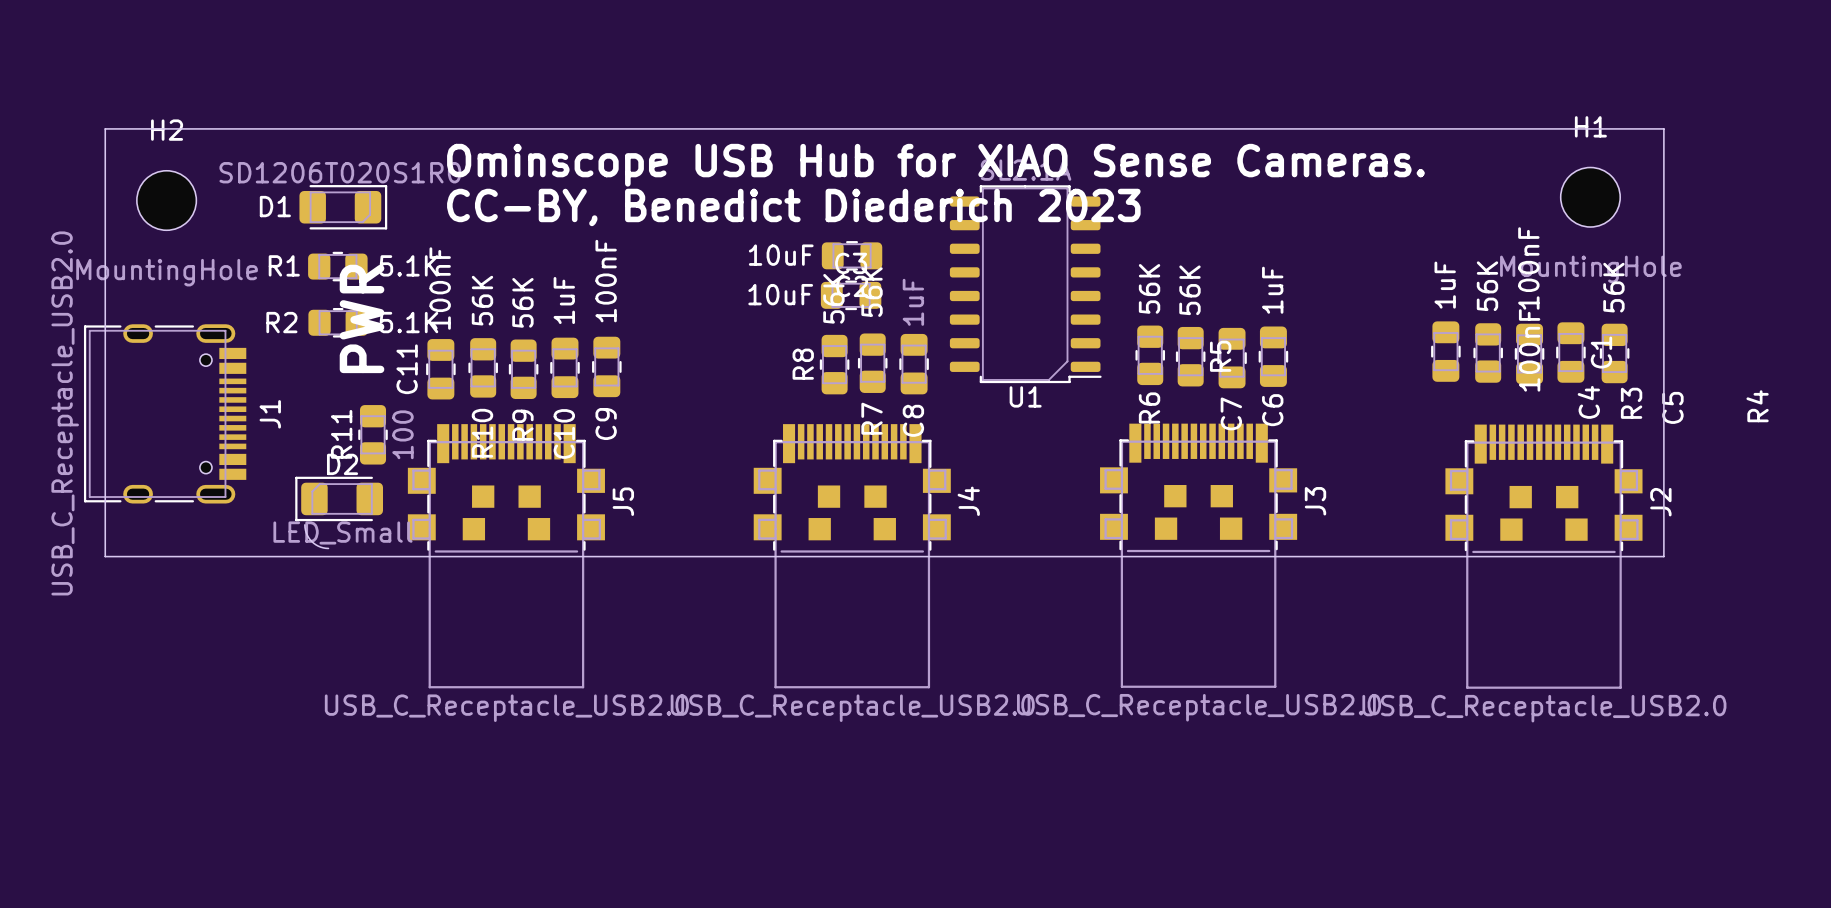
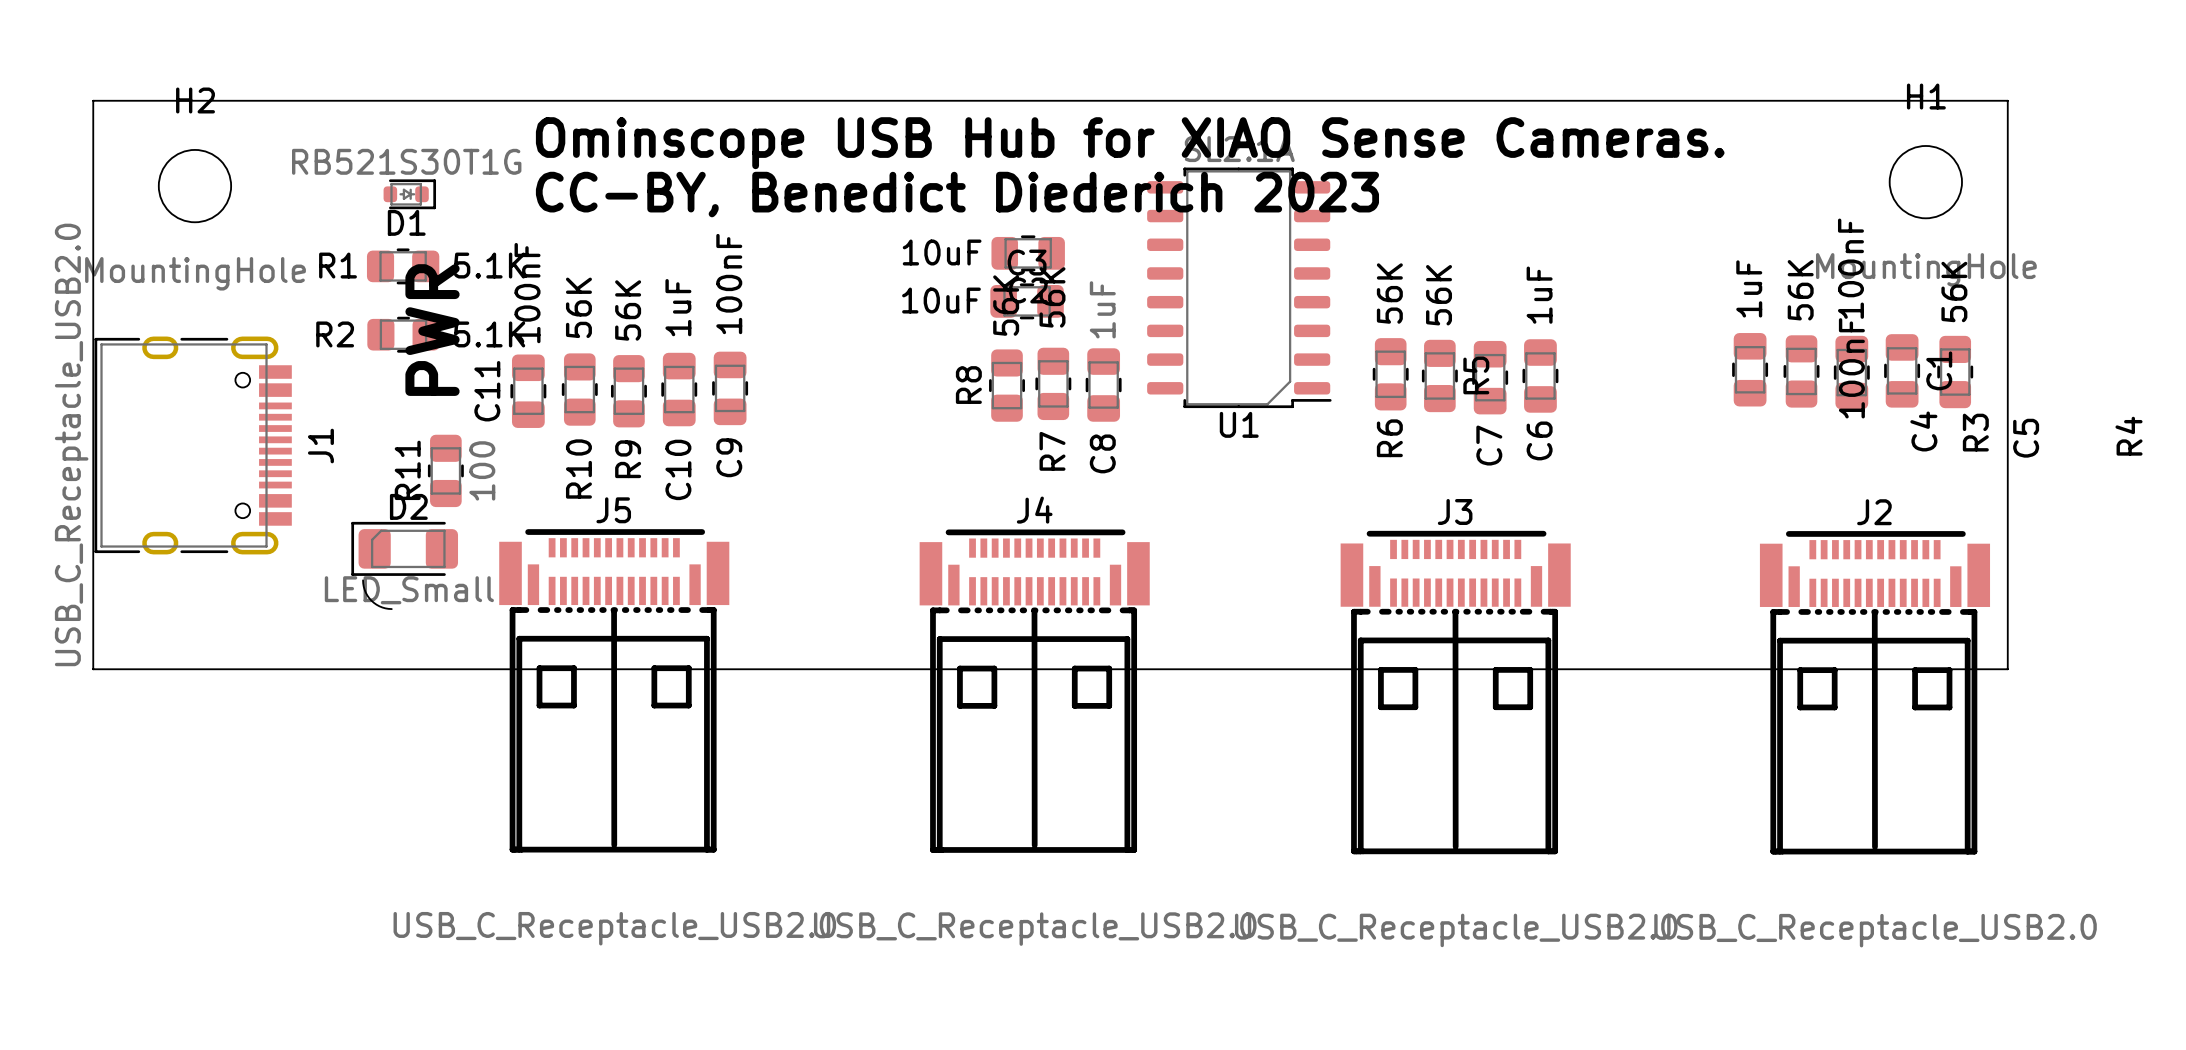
board edge: (105, 128) (1663, 128) (1663, 556) (105, 556) (105, 128) -> (92, 669) (2007, 669) (2007, 100) (93, 100) (93, 669)
D1 value: SD1206T020S1R0 (340, 172) -> RB521S30T1G (406, 161)
D1 footprint: [299, 185, 388, 230] -> [383, 179, 437, 210]
D1 name position: D1 (275, 206) -> D1 (406, 222)
J3 footprint: [1100, 423, 1298, 688] -> [1340, 530, 1571, 855]
J5 footprint: [407, 424, 605, 689] -> [499, 529, 730, 853]
J4 footprint: [753, 424, 951, 689] -> [919, 529, 1150, 853]
J2 footprint: [1445, 424, 1643, 689] -> [1759, 531, 1991, 855]
J5 name position: J5 (623, 501) -> J5 (613, 510)
J4 name position: J4 (968, 501) -> J4 (1034, 510)
J3 name position: J3 (1315, 501) -> J3 (1455, 511)
J2 name position: J2 (1660, 502) -> J2 (1874, 512)
J3 value position: USB_C_Receptacle_USB2.0 (1199, 707) -> USB_C_Receptacle_USB2.0 (1456, 930)
J5 value position: USB_C_Receptacle_USB2.0 (506, 708) -> USB_C_Receptacle_USB2.0 (614, 928)
J4 value position: USB_C_Receptacle_USB2.0 (852, 708) -> USB_C_Receptacle_USB2.0 (1035, 929)
J2 value position: USB_C_Receptacle_USB2.0 (1544, 708) -> USB_C_Receptacle_USB2.0 (1875, 930)

